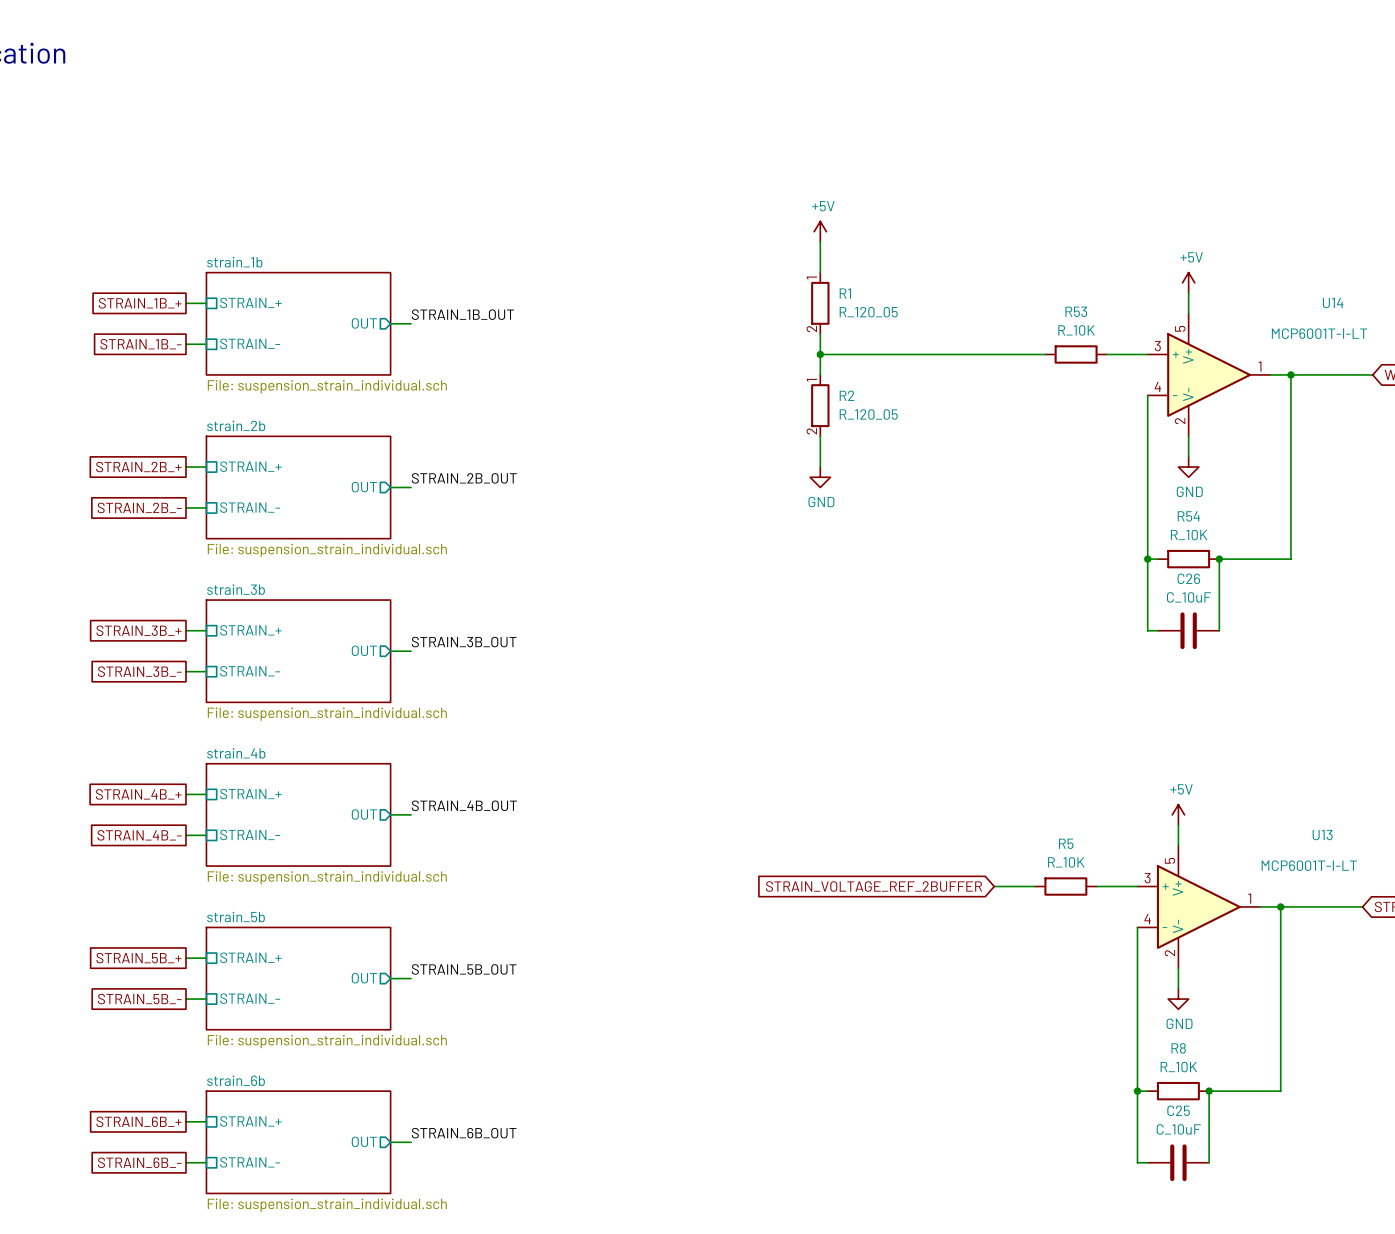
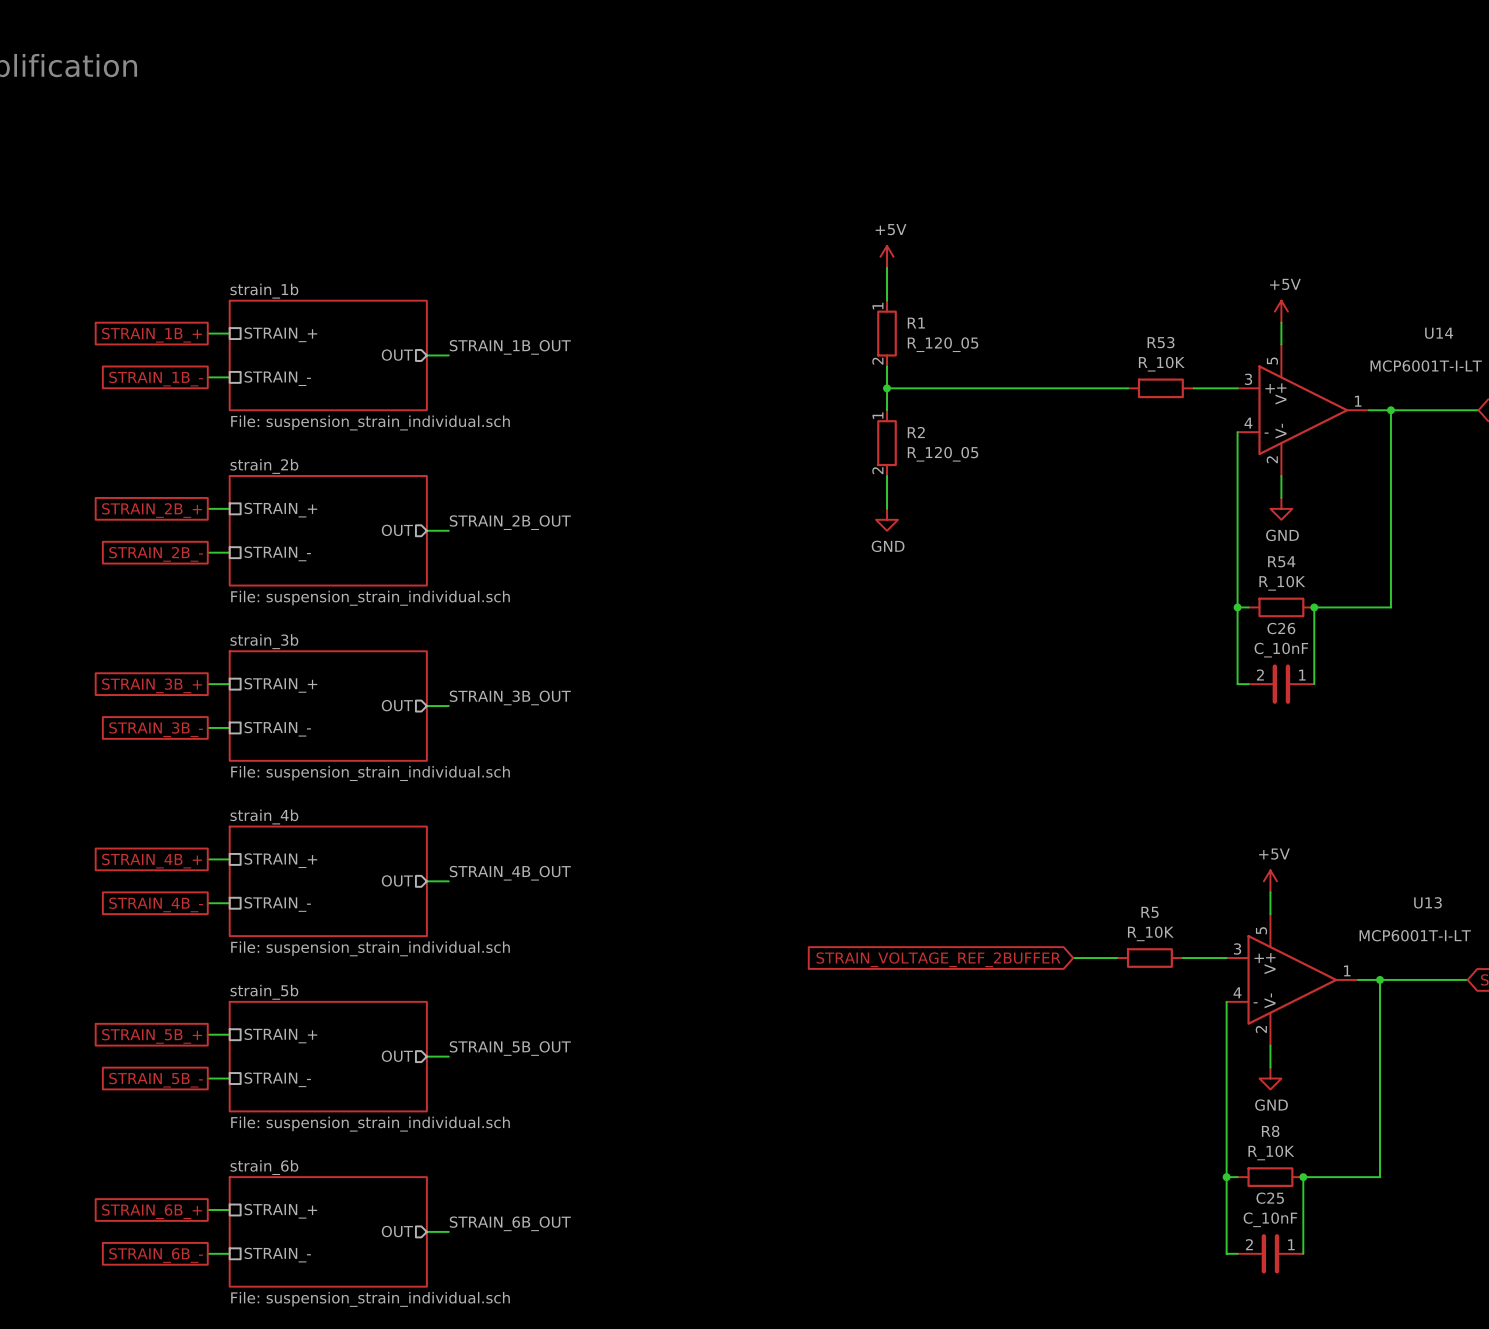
C26 value: C_10uF (1189, 597) -> C_10nF (1281, 650)
C26 pin number: none -> 2 (1260, 675)
C26 pin number: none -> 1 (1302, 675)
C25 value: C_10uF (1178, 1129) -> C_10nF (1270, 1219)
C25 pin number: none -> 2 (1249, 1244)
C25 pin number: none -> 1 (1291, 1244)

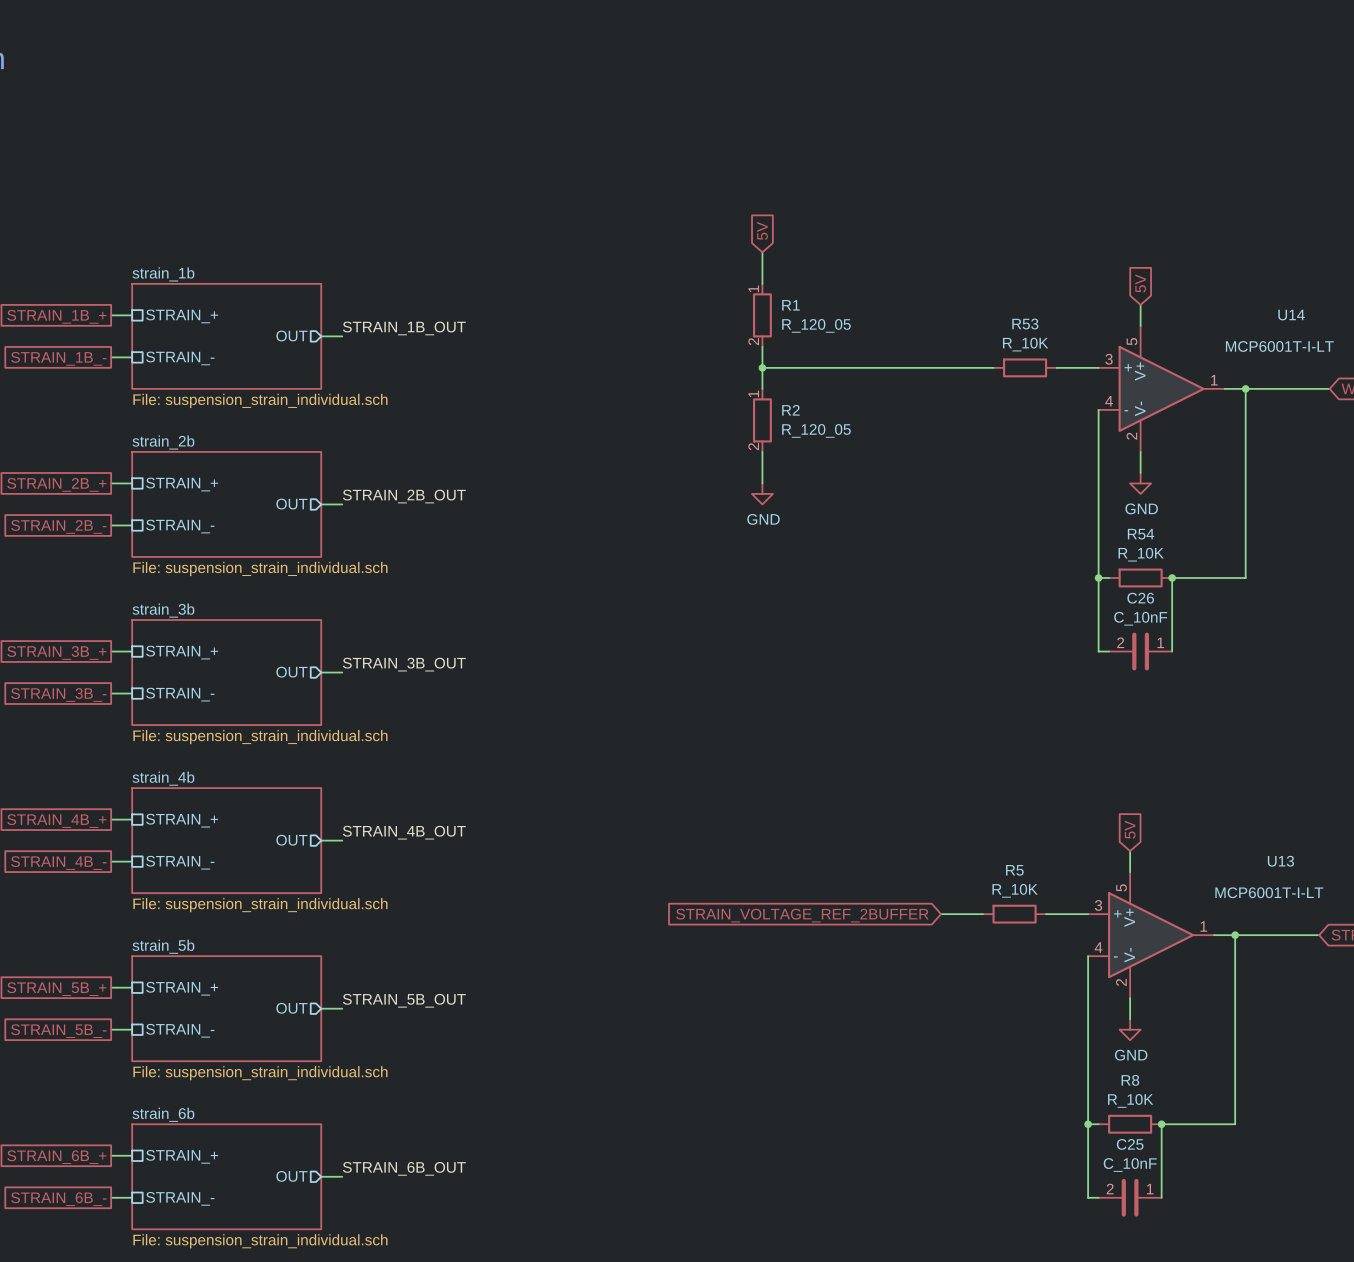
global label: none -> 5V (762, 230)
power symbol: +5V (887, 256) -> none
global label: none -> 5V (1140, 283)
power symbol: +5V (1281, 311) -> none
global label: none -> 5V (1130, 829)
power symbol: +5V (1270, 881) -> none

